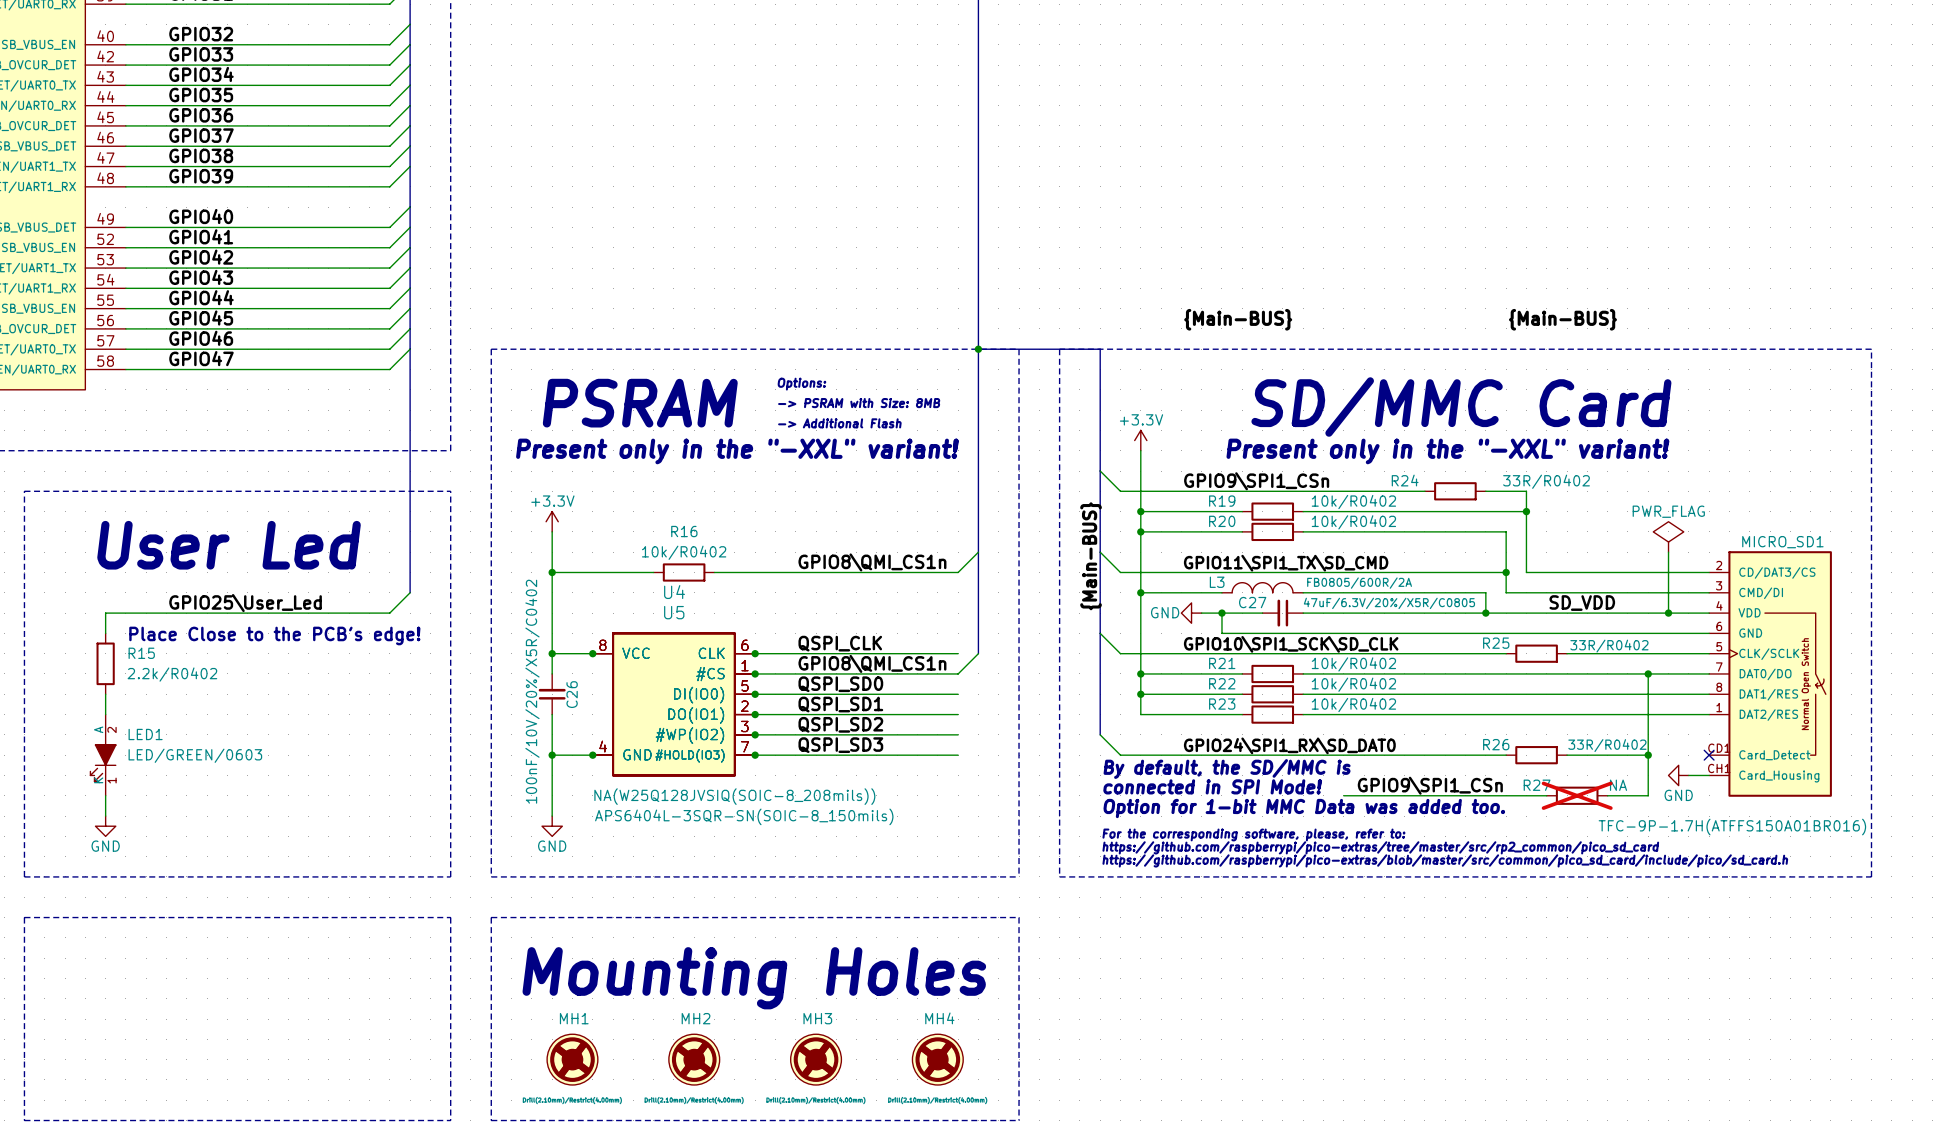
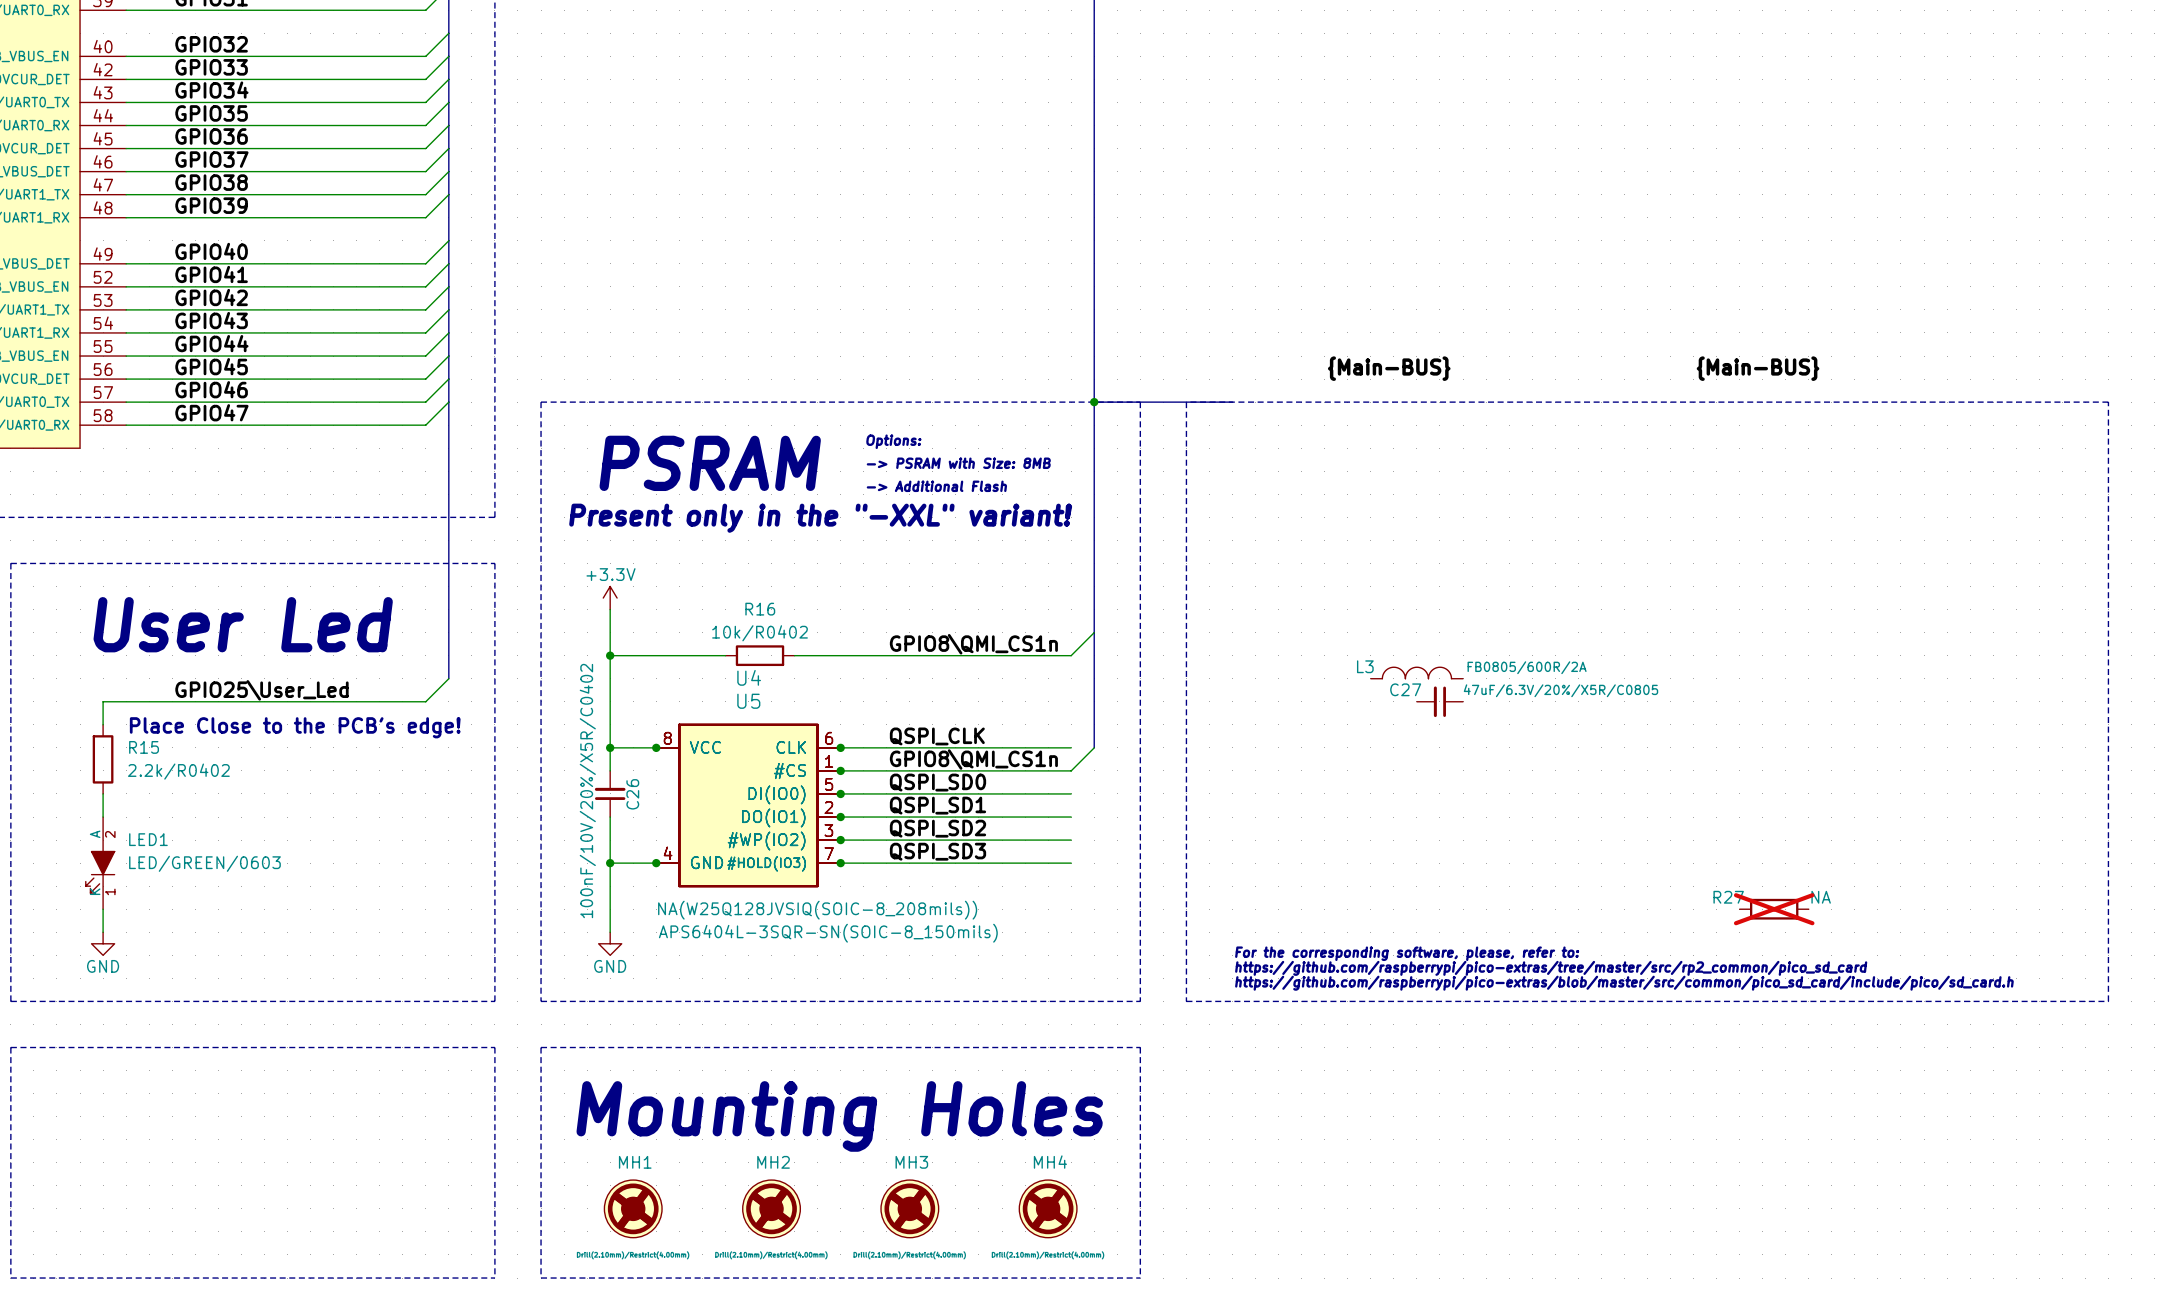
bus: (1100, 349) (1100, 734) -> none
text: SD/MMC Card (1461, 407) -> none
power symbol: +3.3V (1140, 440) -> none
wire: (1140, 450) (1140, 714) (1242, 714) -> none
text: Present only in the "-XXL" variant! (1447, 451) -> none
wire: (1100, 471) (1120, 491) (1424, 491) -> none
label: GPIO9\SPI1_CSn (1256, 481) -> none
R24: 33R/R0402 (1455, 491) -> none
wire: (1485, 491) (1526, 491) (1526, 572) (1709, 572) -> none
wire: (1140, 511) (1242, 511) -> none
junction: (1140, 511) -> none
R19: 10k/R0402 (1272, 511) -> none
wire: (1303, 511) (1526, 511) -> none
junction: (1526, 511) -> none
wire: (1140, 531) (1242, 531) -> none
junction: (1140, 531) -> none
R20: 10k/R0402 (1272, 531) -> none
wire: (1303, 531) (1506, 531) (1506, 592) (1709, 592) -> none
power symbol: PWR_FLAG (1668, 536) -> none
wire: (1100, 552) (1120, 572) (1506, 572) -> none
wire: (1668, 552) (1668, 613) -> none
label: {Main-BUS} (1091, 556) -> none
label: GPIO11\SPI1_TX\SD_CMD (1286, 563) -> none
junction: (1506, 572) -> none
wire: (1140, 592) (1221, 592) -> none
junction: (1140, 592) -> none
wire: (1303, 592) (1485, 592) (1485, 613) -> none
label: SD_VDD (1582, 603) -> none
power symbol: GND (1191, 613) -> none
wire: (1201, 613) (1262, 613) -> none
wire: (1221, 613) (1221, 633) (1709, 633) -> none
junction: (1221, 613) -> none
wire: (1303, 613) (1709, 613) -> none
junction: (1485, 613) -> none
junction: (1668, 613) -> none
wire: (1100, 633) (1120, 653) (1506, 653) -> none
label: GPIO10\SPI1_SCK\SD_CLK (1291, 644) -> none
R25: 33R/R0402 (1536, 653) -> none
wire: (1567, 653) (1709, 653) -> none
wire: (1140, 673) (1242, 673) -> none
junction: (1140, 673) -> none
R21: 10k/R0402 (1272, 673) -> none
wire: (1303, 673) (1709, 673) -> none
wire: (1648, 673) (1648, 795) (1607, 795) -> none
junction: (1648, 673) -> none
MICRO_SD1: TFC-9P-1.7H(ATFFS150A01BR016) (1770, 673) -> none
wire: (1140, 694) (1242, 694) -> none
junction: (1140, 694) -> none
R22: 10k/R0402 (1272, 694) -> none
wire: (1303, 694) (1709, 694) -> none
R23: 10k/R0402 (1272, 714) -> none
wire: (1303, 714) (1709, 714) -> none
wire: (1100, 734) (1120, 755) (1506, 755) -> none
label: GPIO24\SPI1_RX\SD_DAT0 (1289, 745) -> none
R26: 33R/R0402 (1536, 755) -> none
wire: (1567, 755) (1648, 755) -> none
junction: (1648, 755) -> none
no-connect mark: (1709, 755) -> none
text: By default, the SD/MMC is (1227, 769) -> none
power symbol: GND (1678, 775) -> none
wire: (1688, 775) (1709, 775) -> none
label: GPIO9\SPI1_CSn (1430, 785) -> none
text: connected in SPI Mode! (1212, 786) -> none
wire: (1343, 795) (1546, 795) -> none
text: Option for 1-bit MMC Data was added too. (1304, 808) -> none

